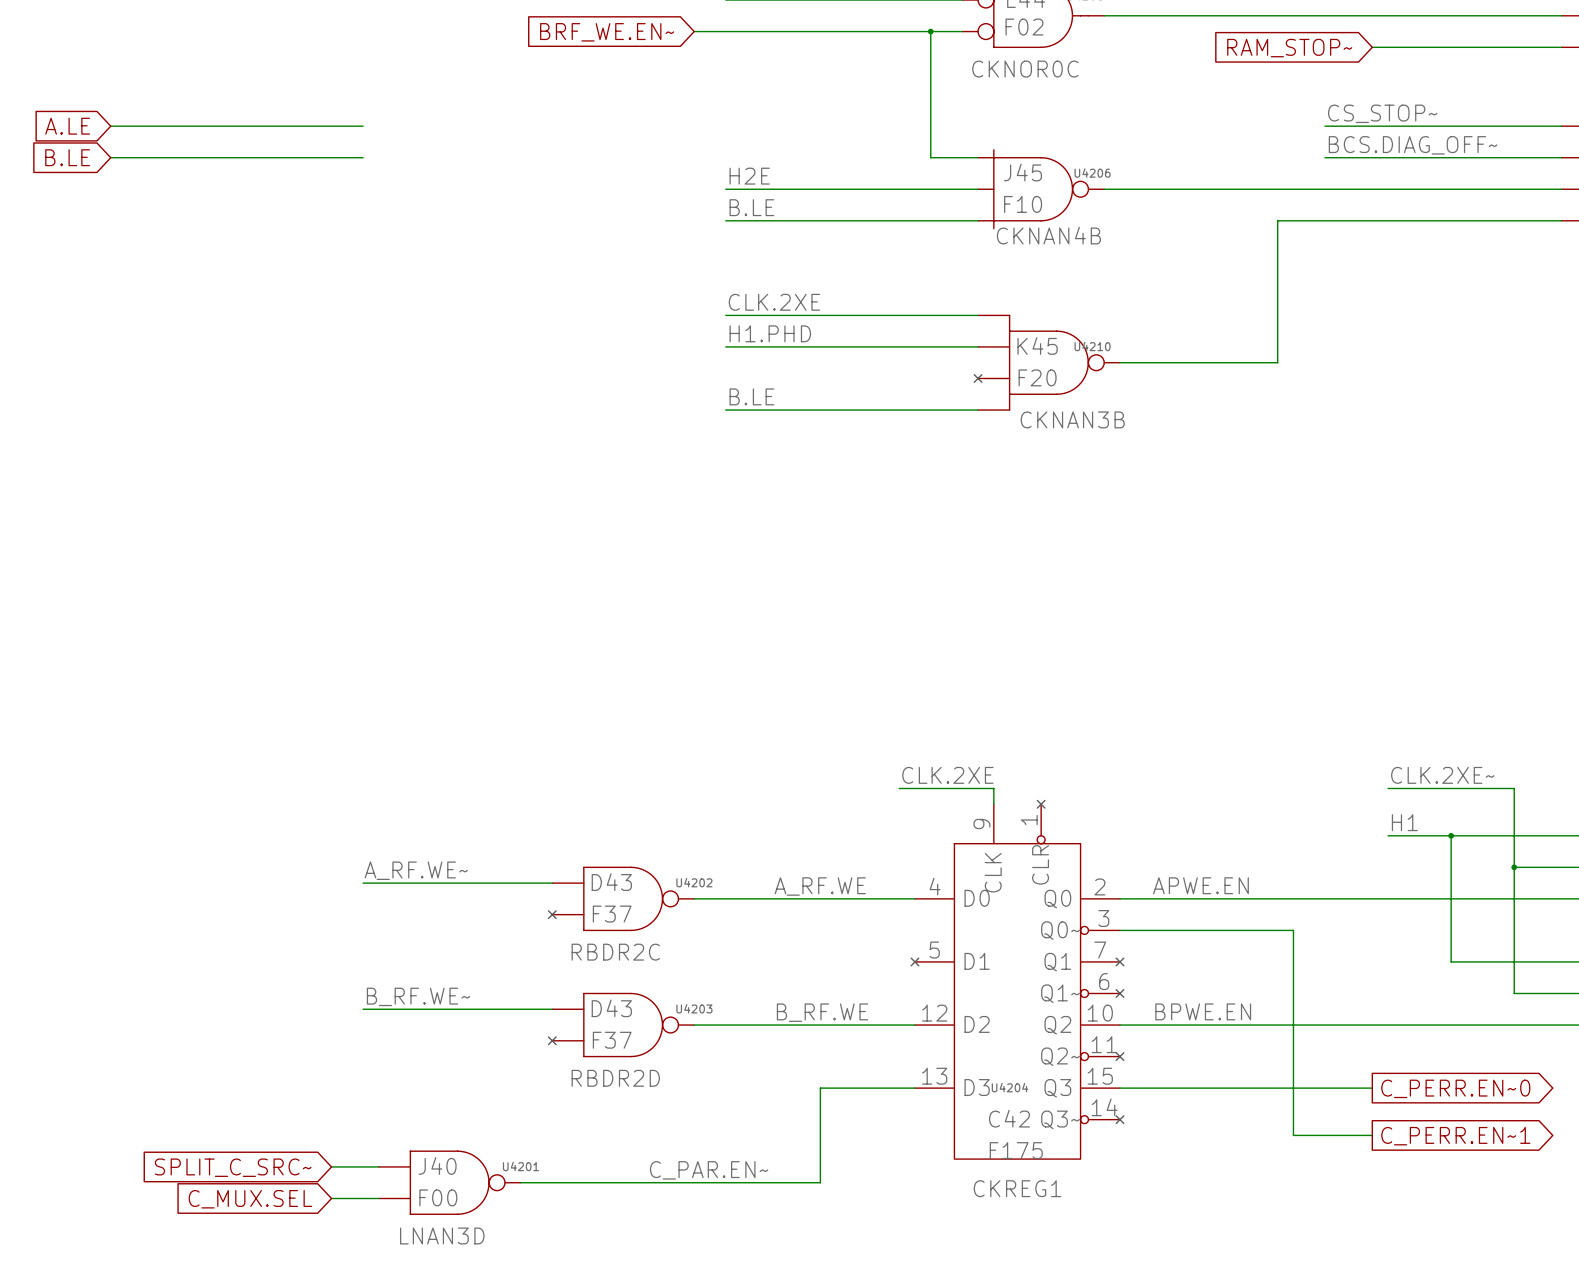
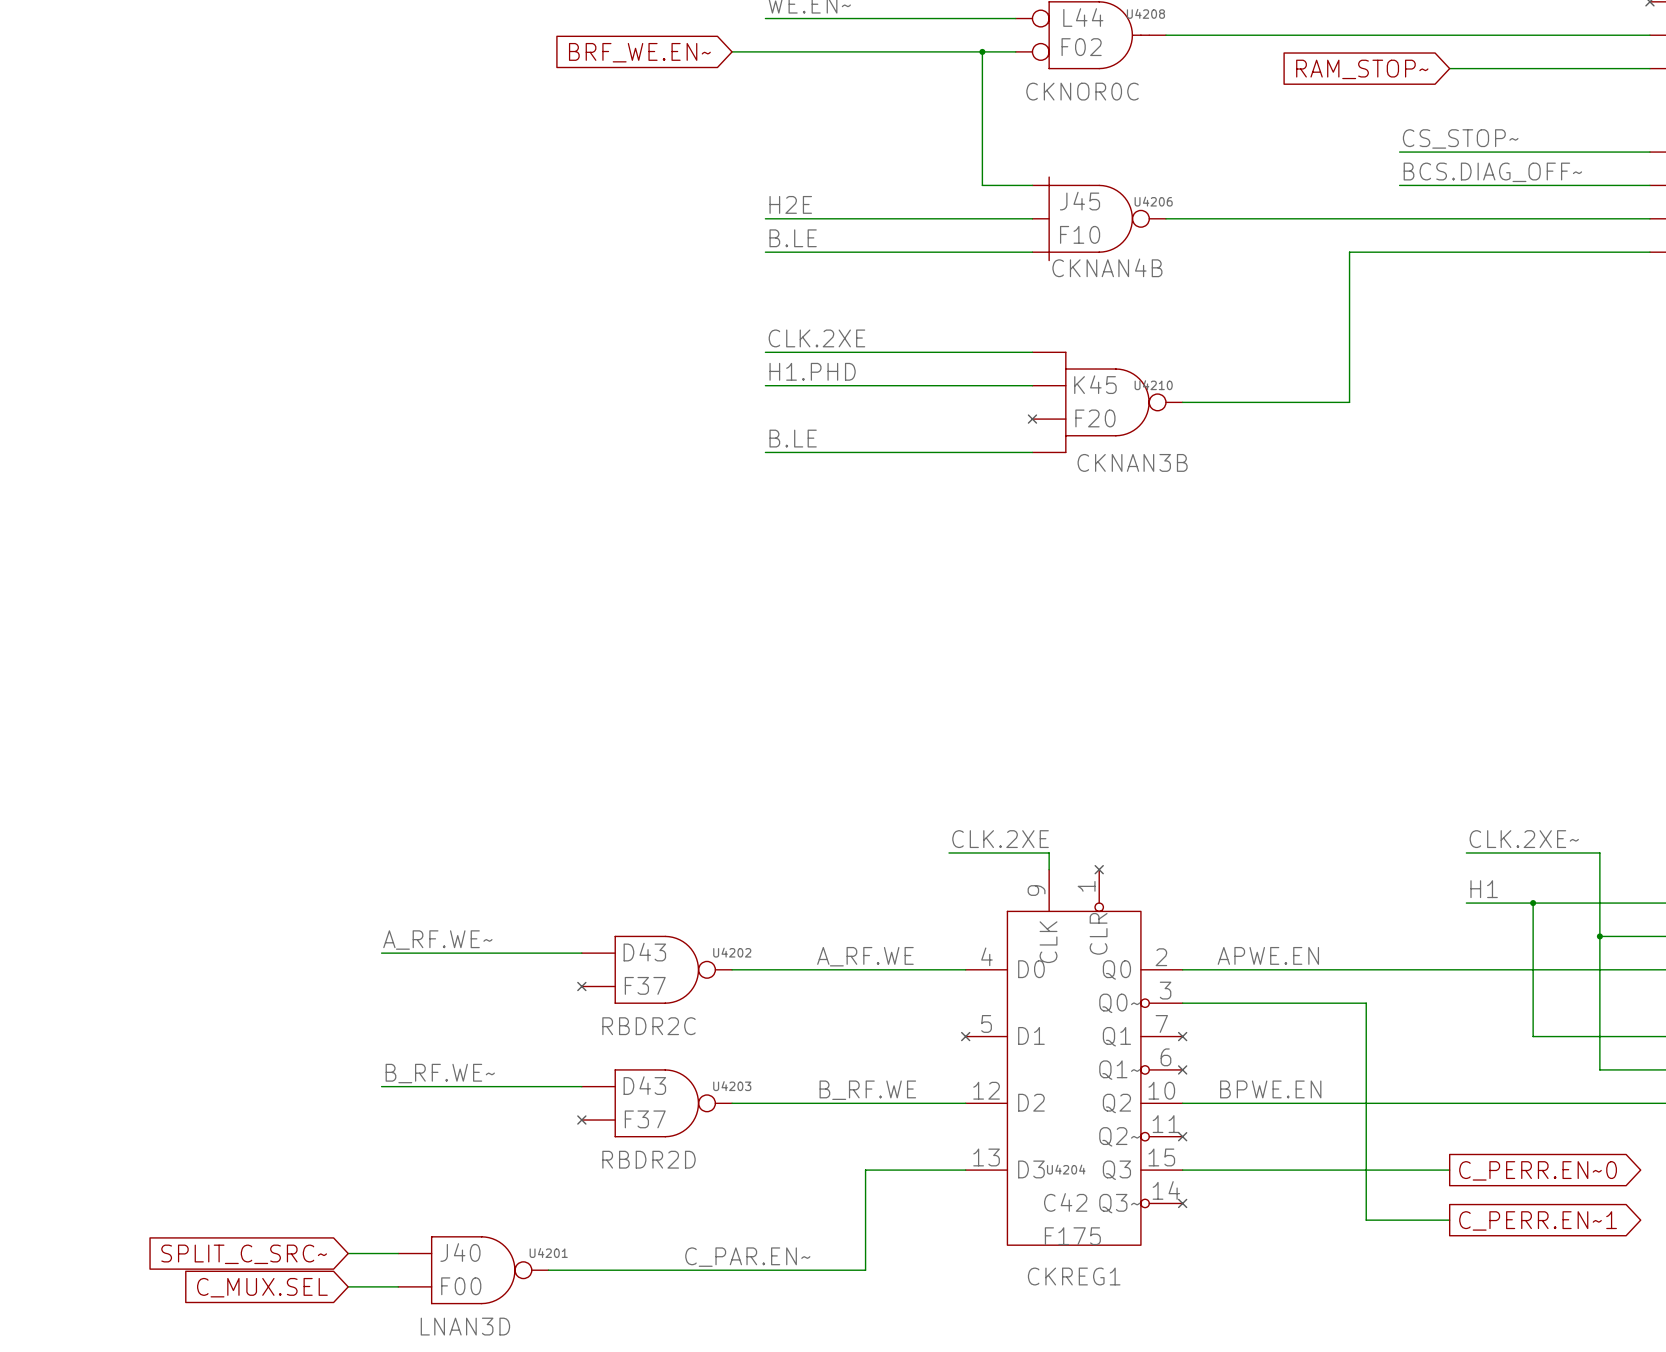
global label: A.LE (67, 126) -> none
wire: (110, 126) (363, 126) -> none
global label: B.LE (67, 157) -> none
wire: (110, 157) (363, 157) -> none

